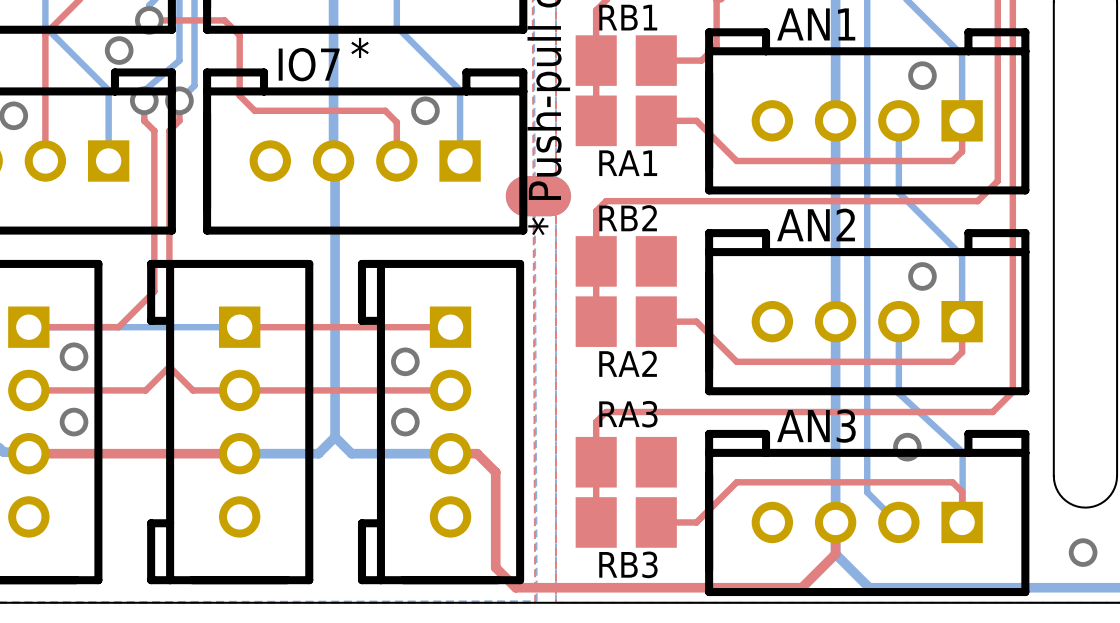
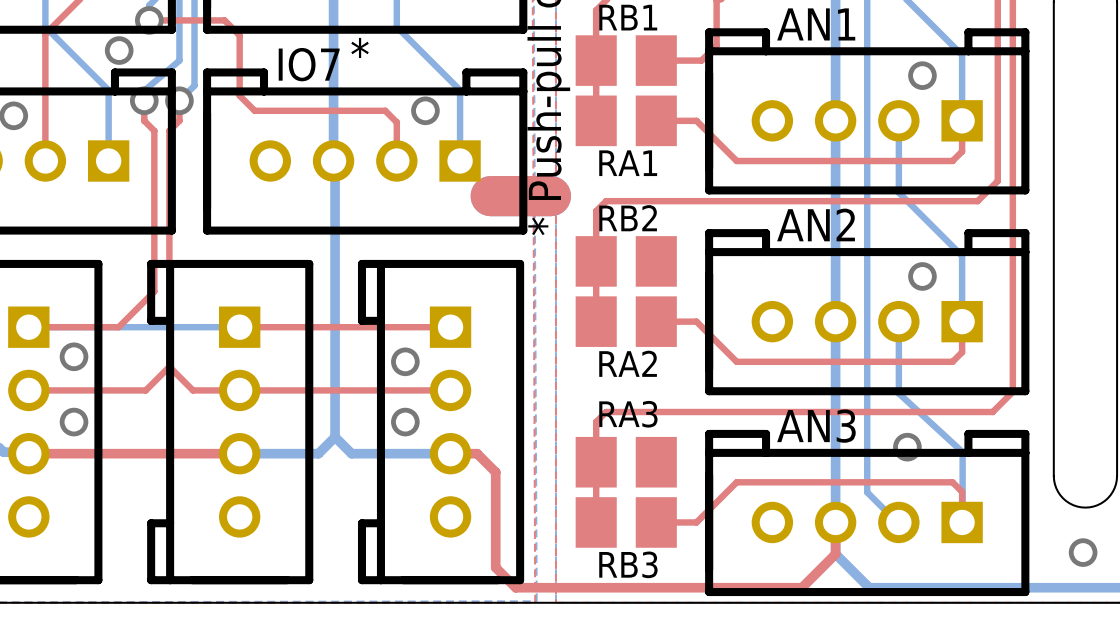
top track: none -> (490, 196) (525, 196)

